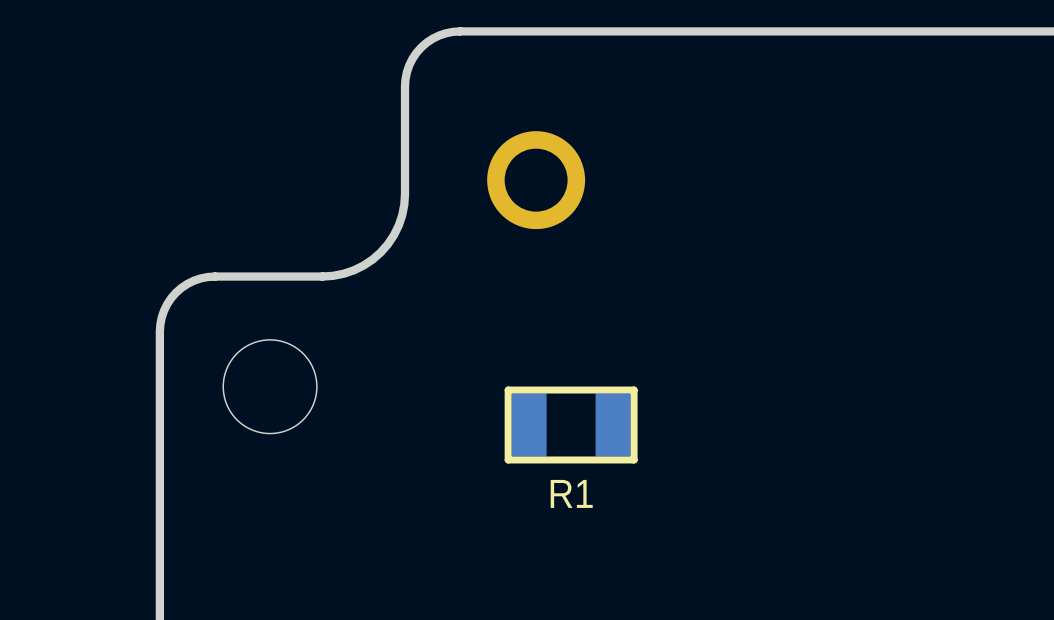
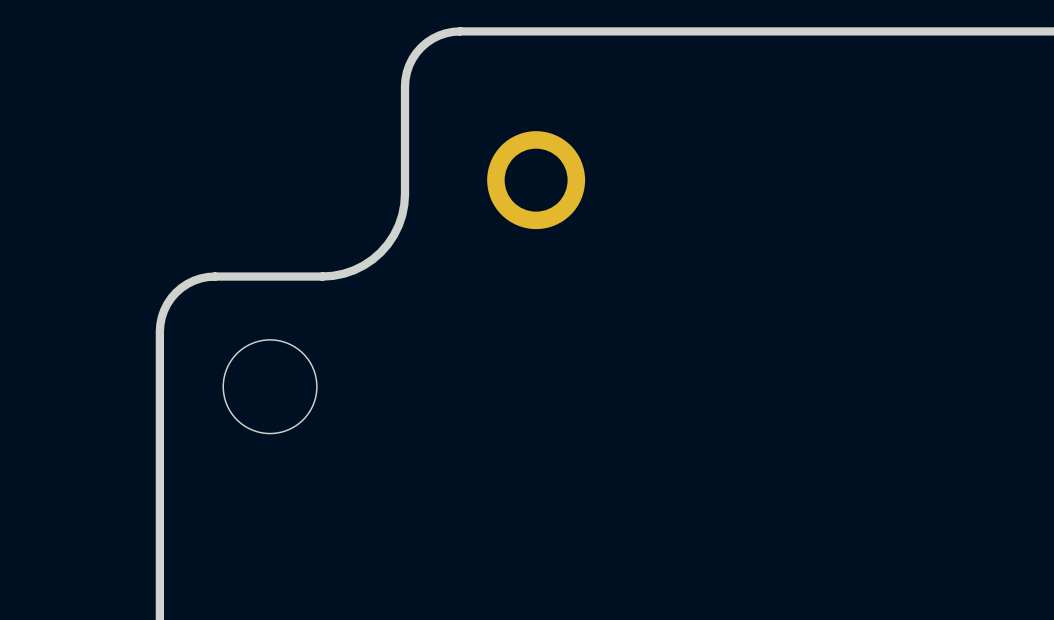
R1: (571, 425) -> none

